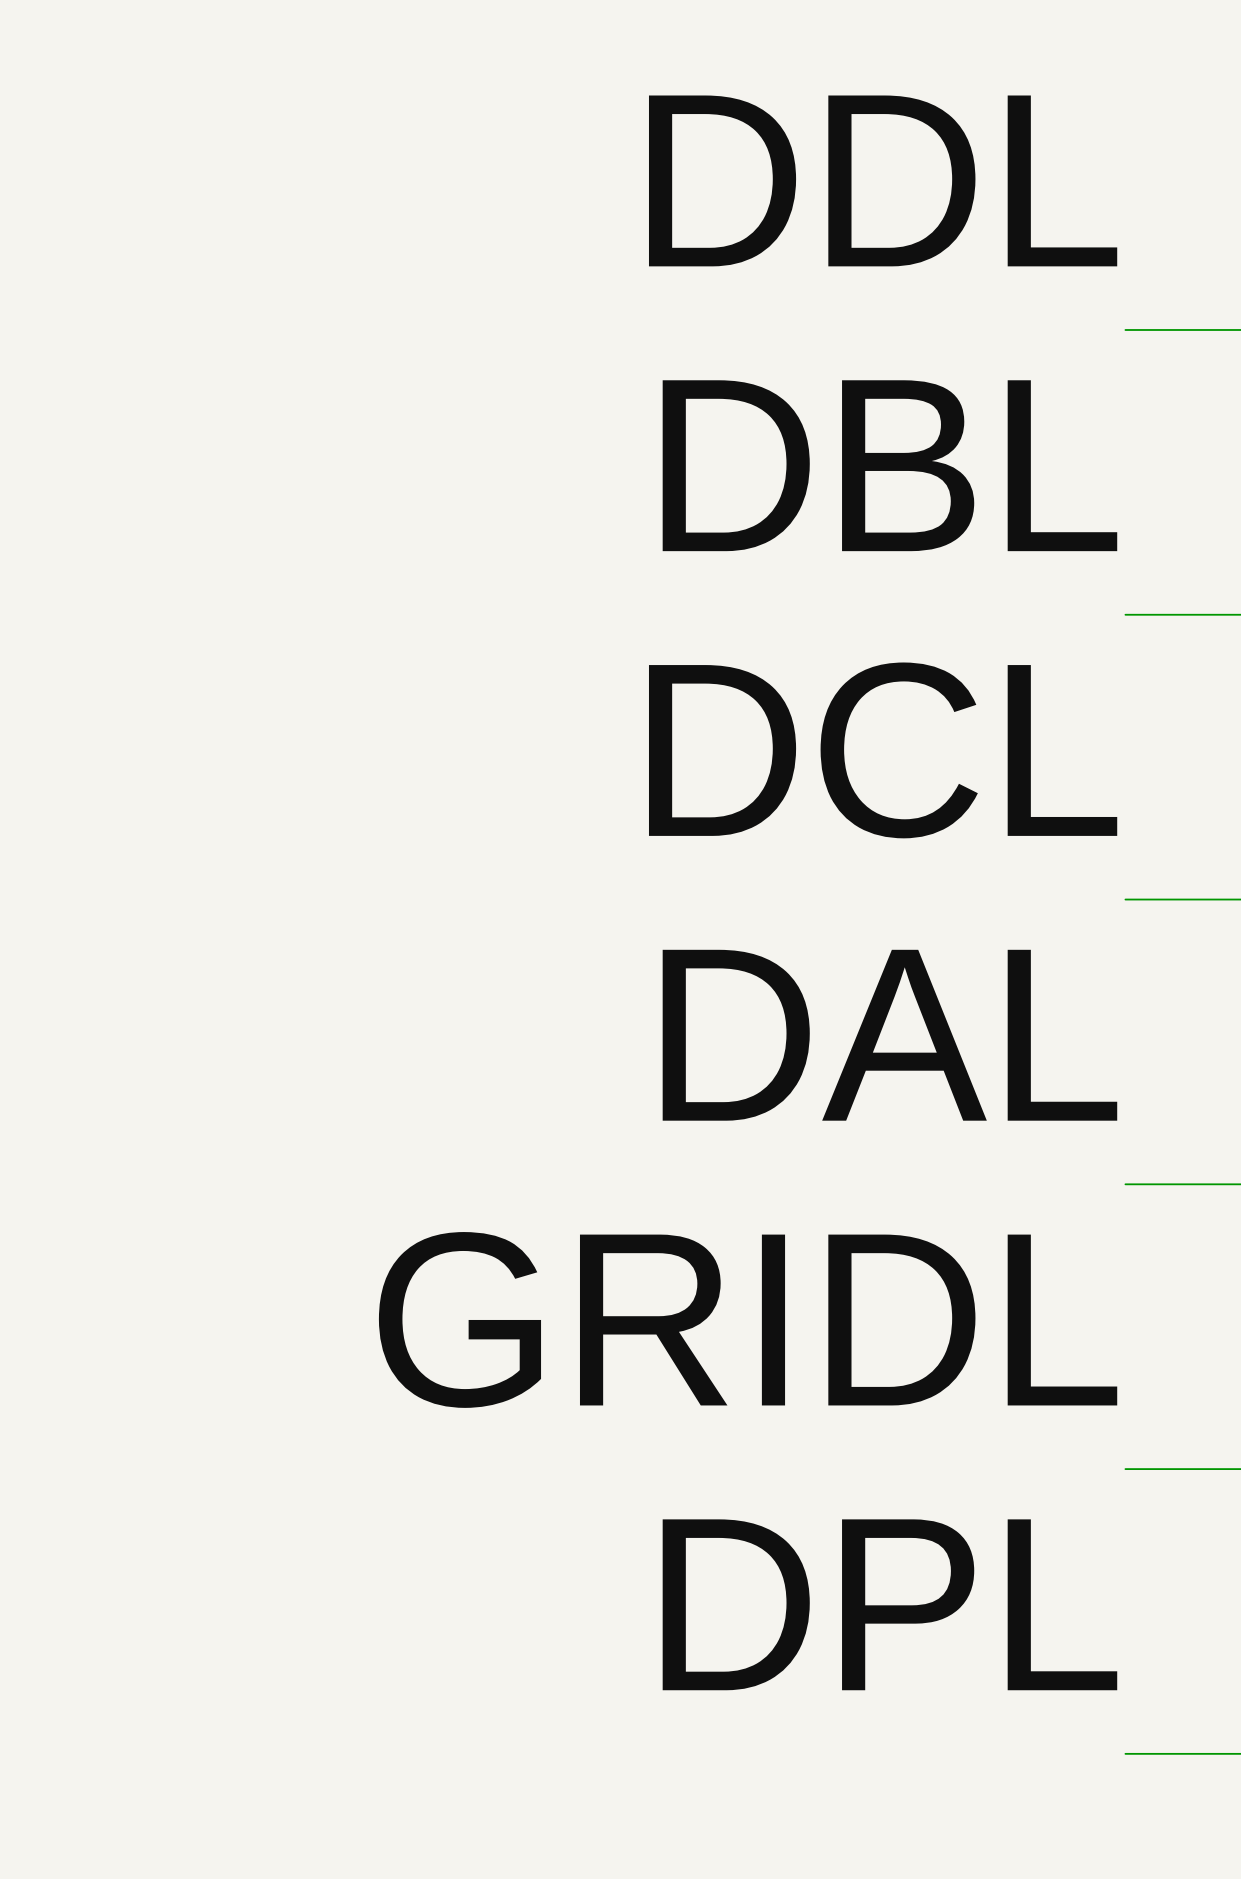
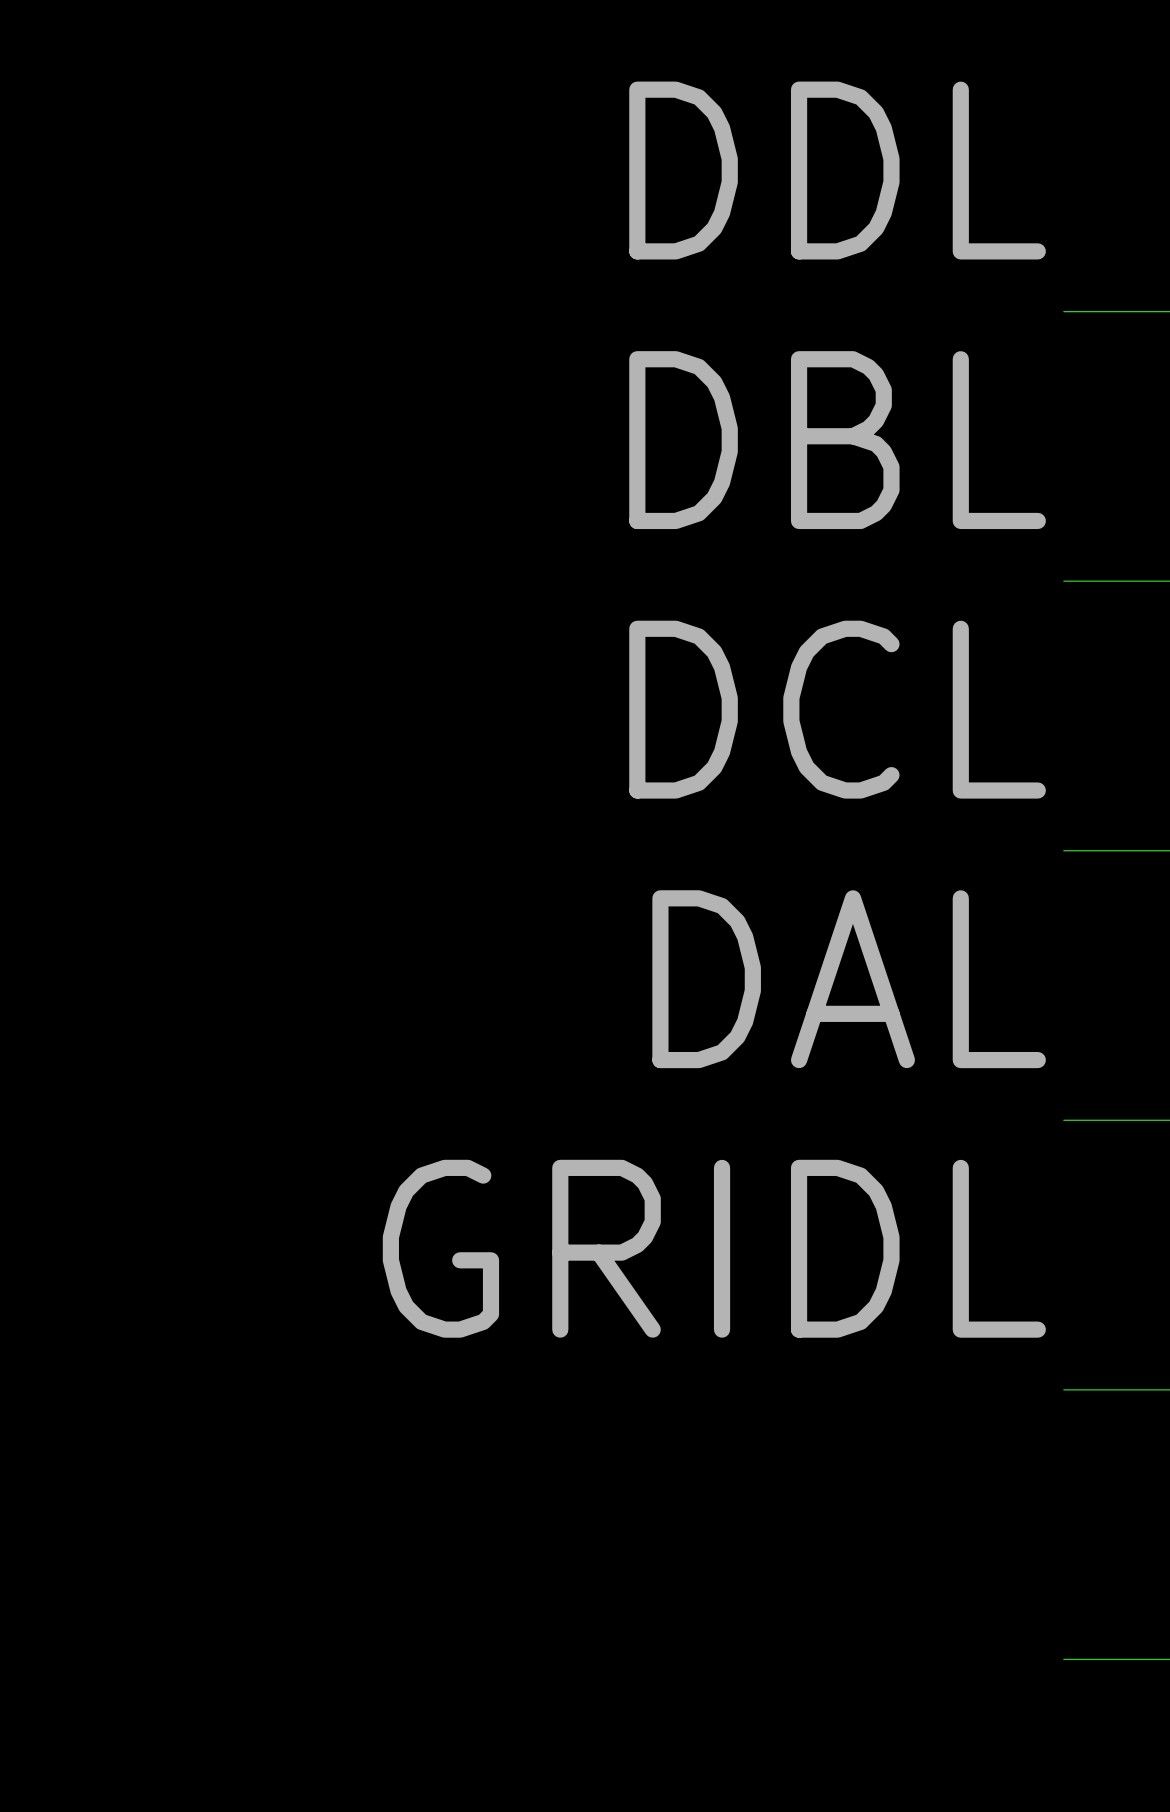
label: DPL (889, 1604) -> none

